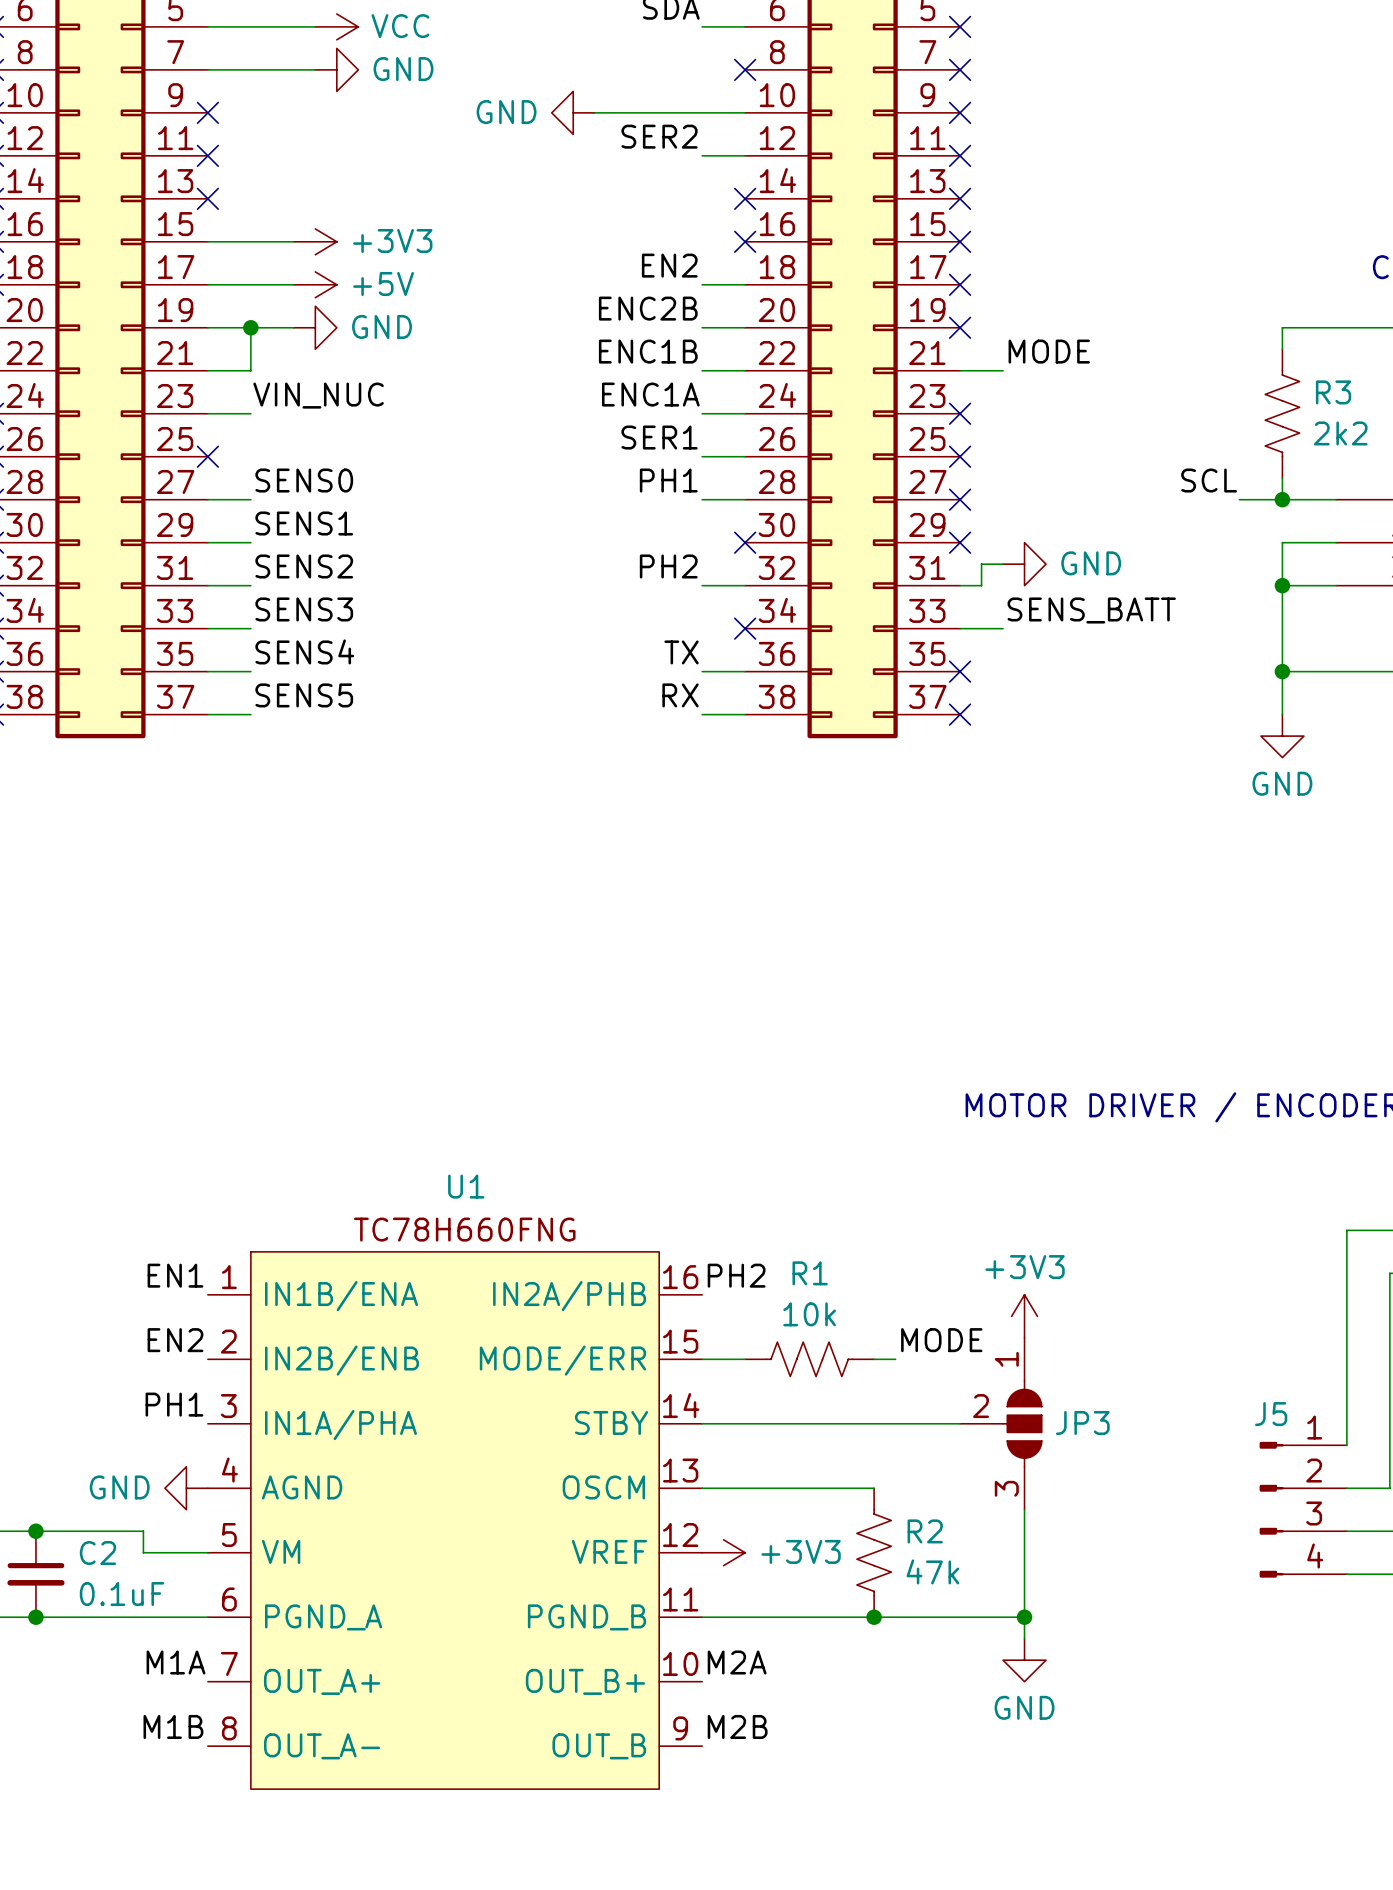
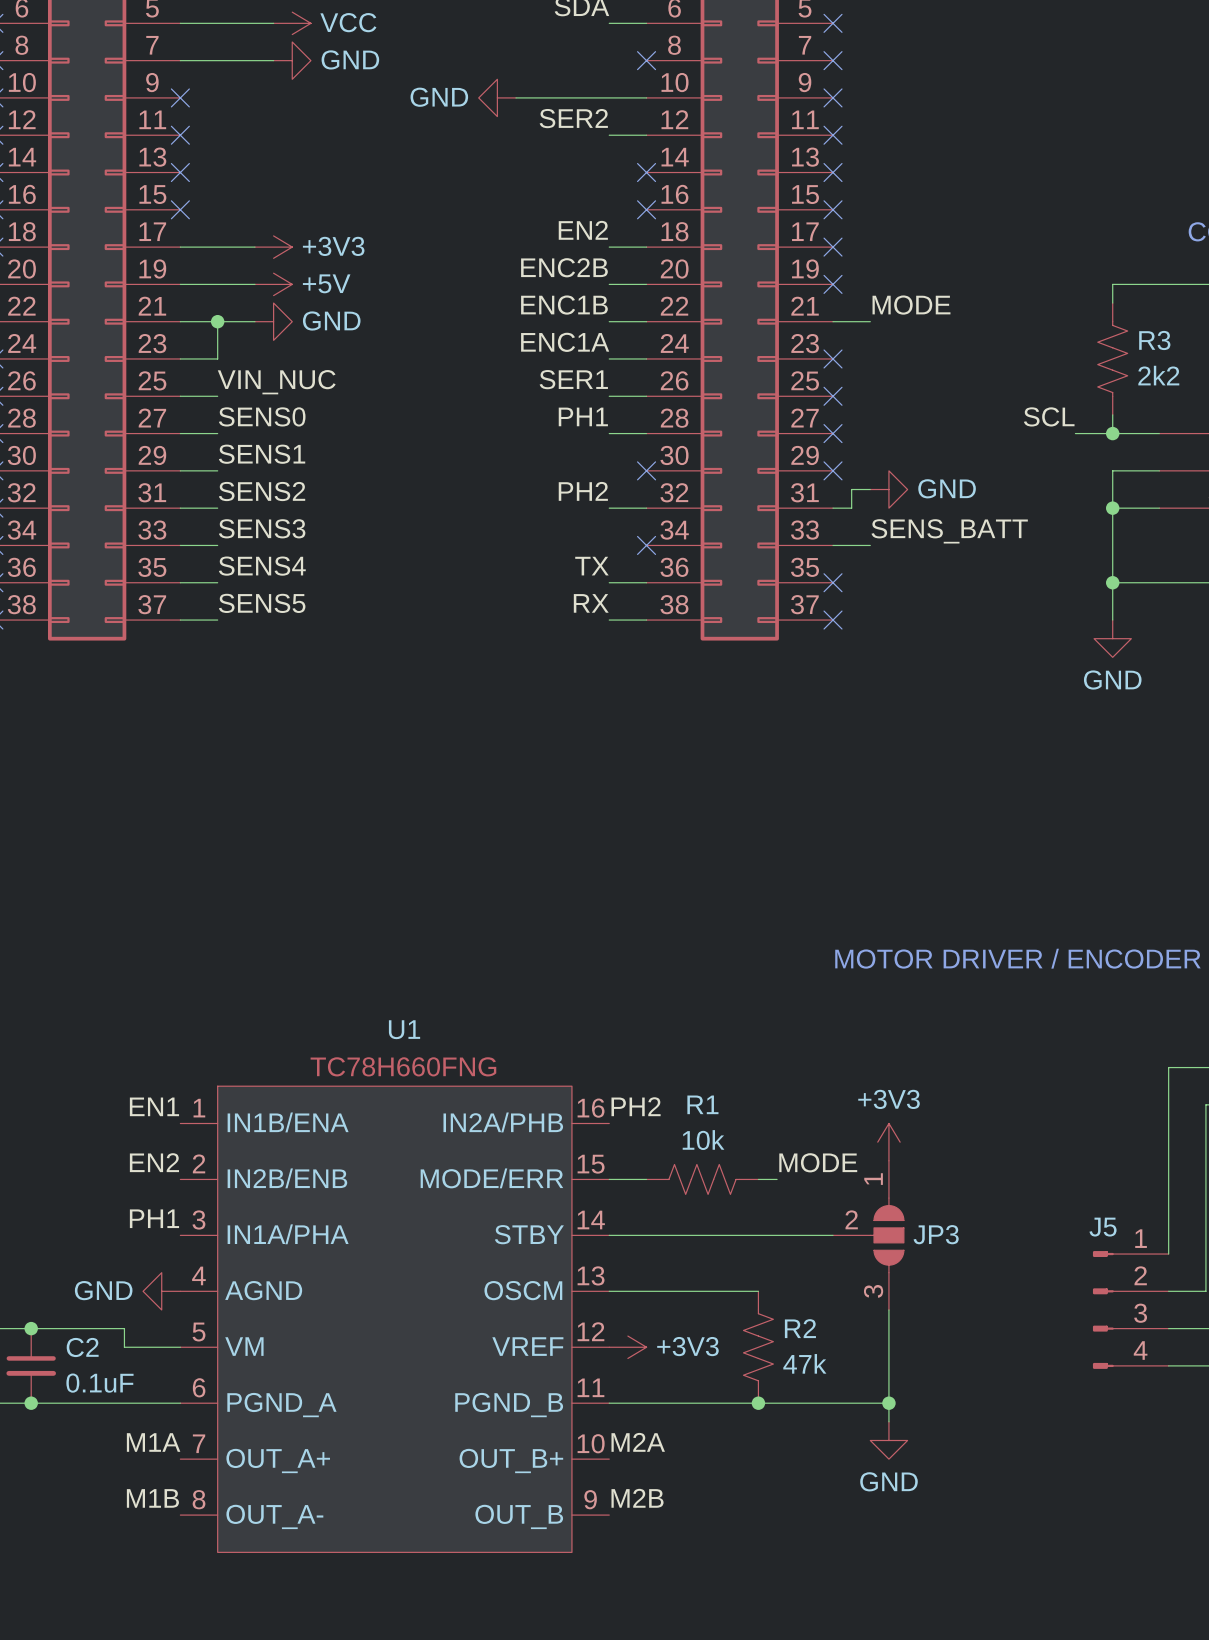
wire: (207, 241) (293, 241) -> none
no-connect mark: none -> (180, 209)
power symbol: +3V3 (315, 241) -> none
power symbol: +5V (315, 284) -> +3V3 (273, 247)
wire: (250, 327) (250, 370) -> none
junction position: (250, 327) -> (217, 321)
power symbol: GND (315, 327) -> +5V (273, 284)
wire: none -> (254, 321) (217, 321) (217, 358)
power symbol: none -> GND (273, 321)
label position: VIN_NUC (318, 395) -> VIN_NUC (276, 382)
wire: none -> (180, 396) (217, 396)
no-connect mark: (207, 456) -> none

